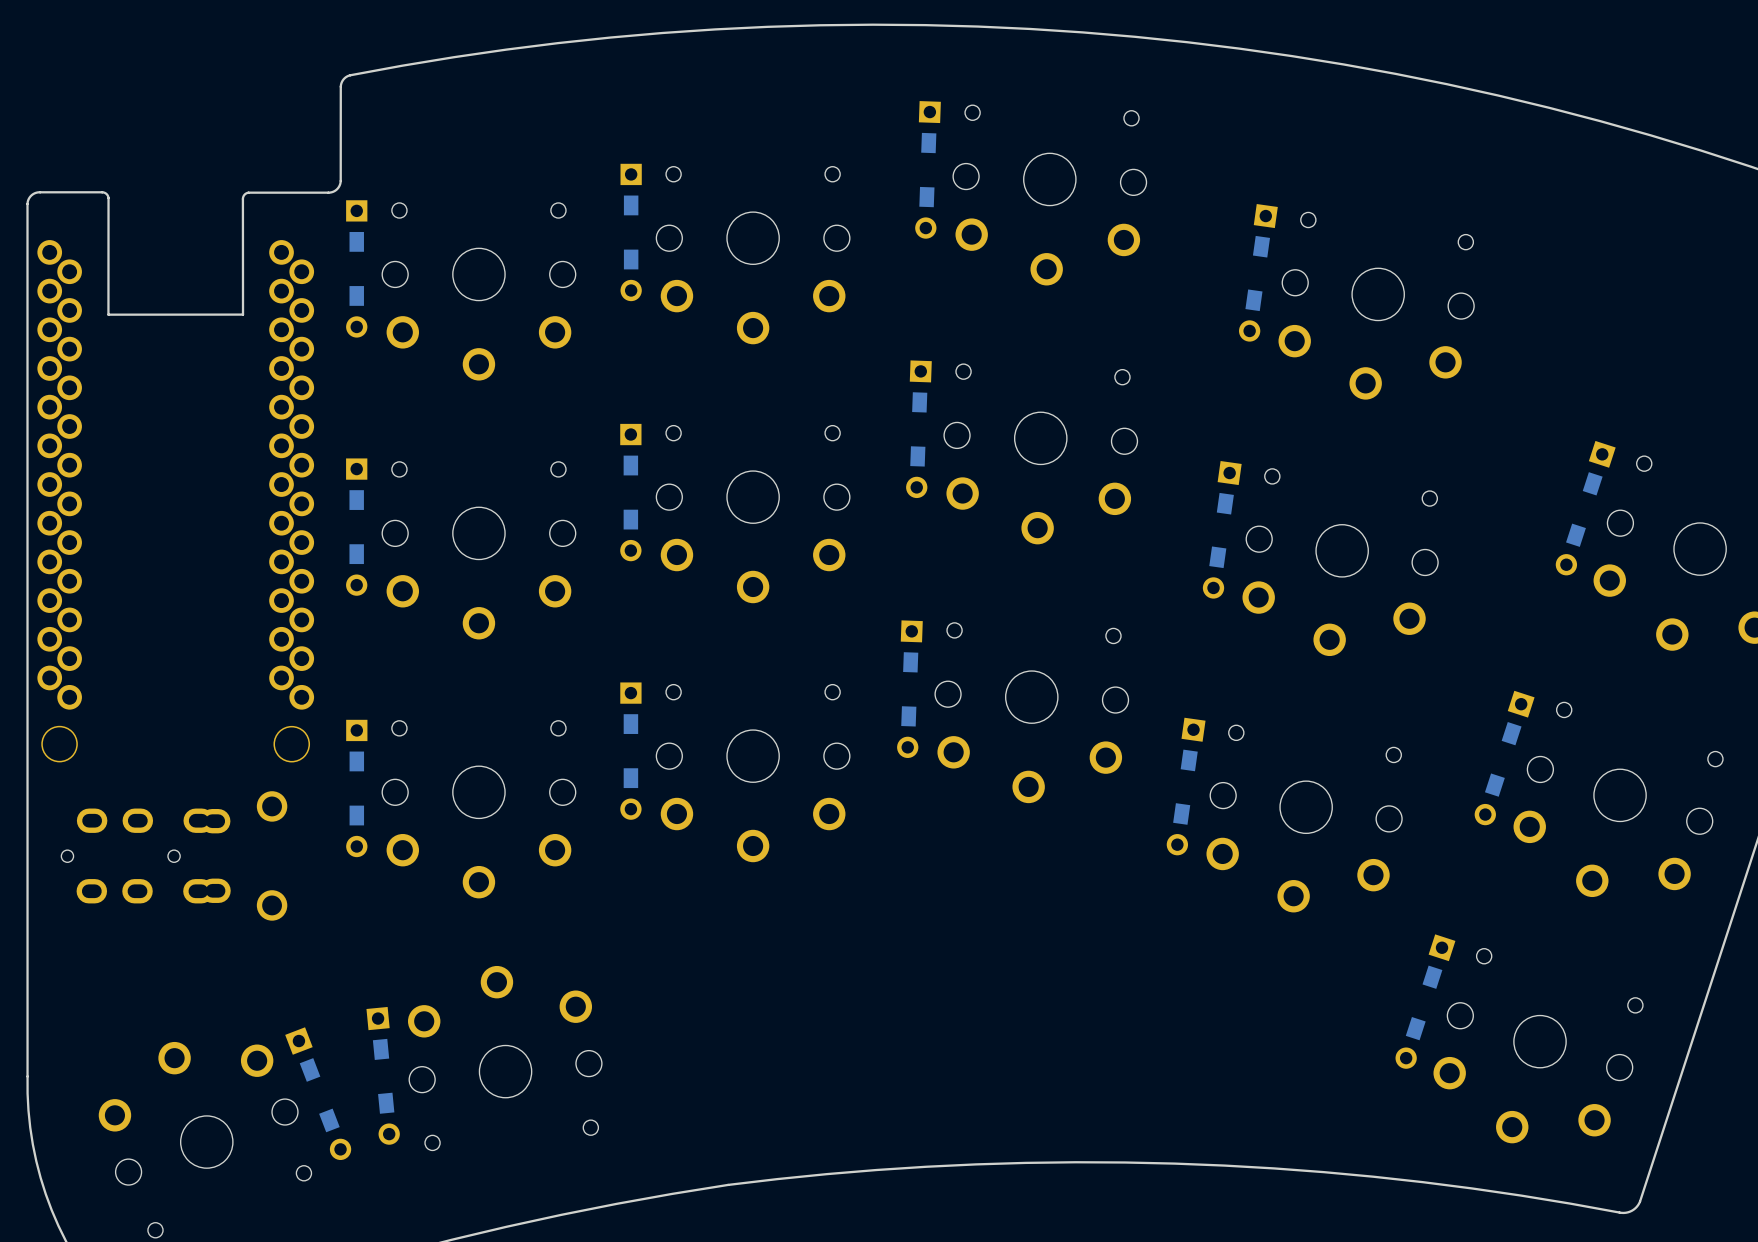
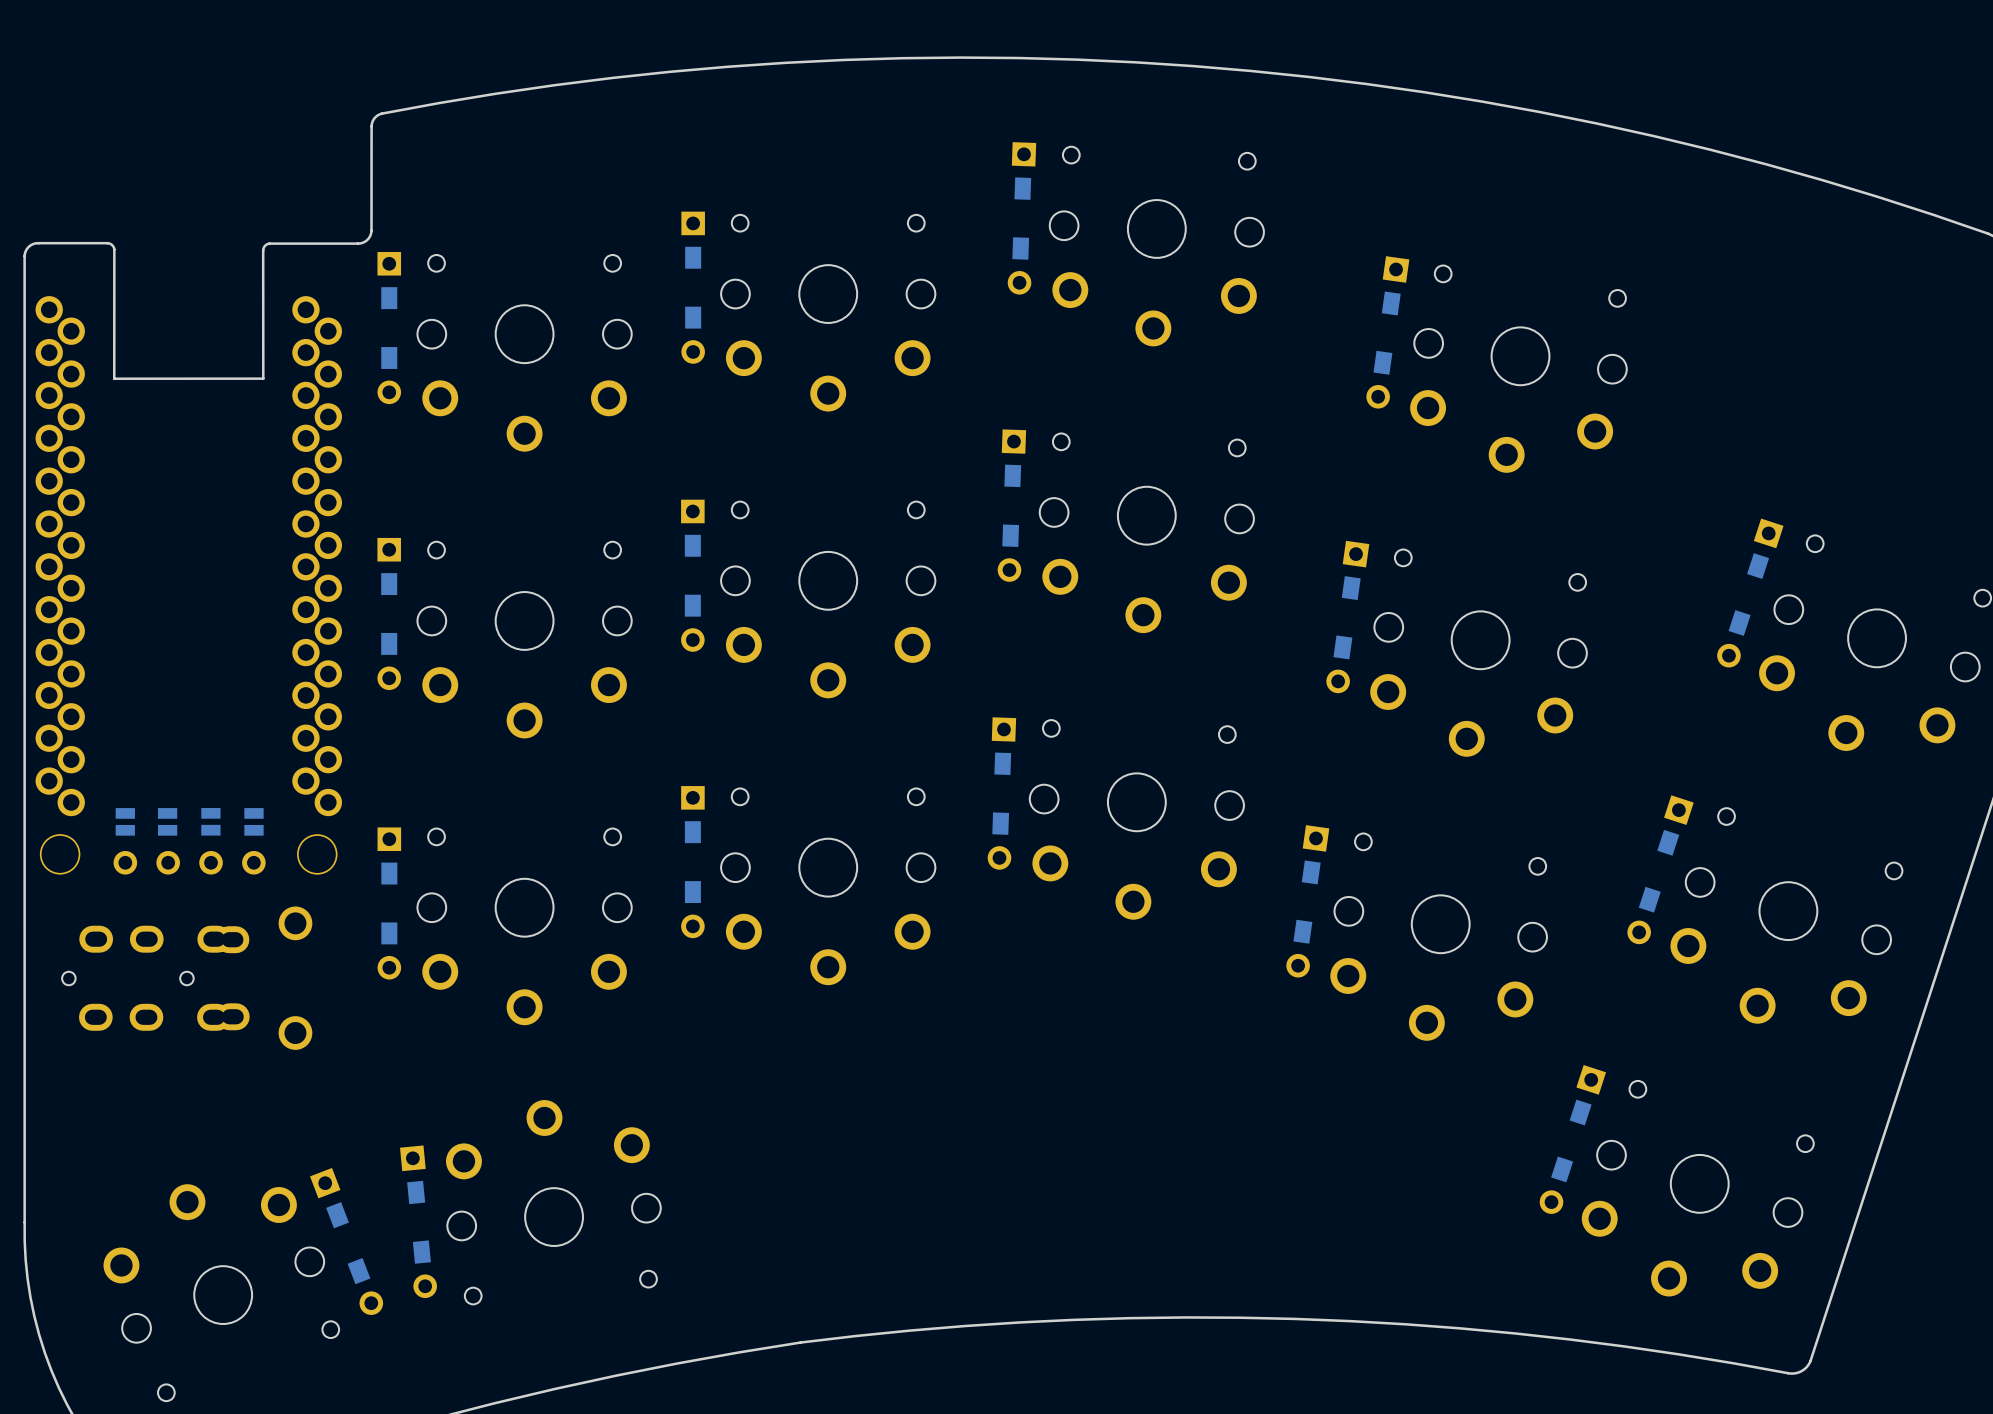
part: none -> (125, 821)
part: none -> (167, 821)
part: none -> (210, 821)
part: none -> (254, 821)
part: none -> (189, 862)

